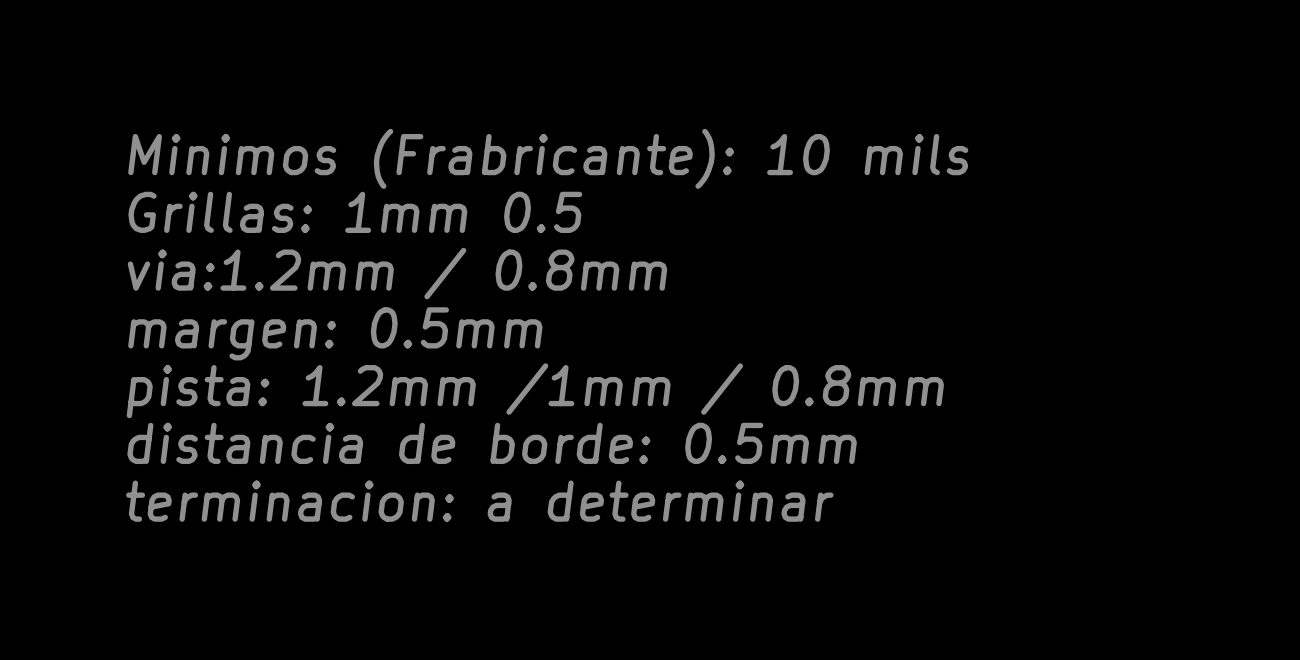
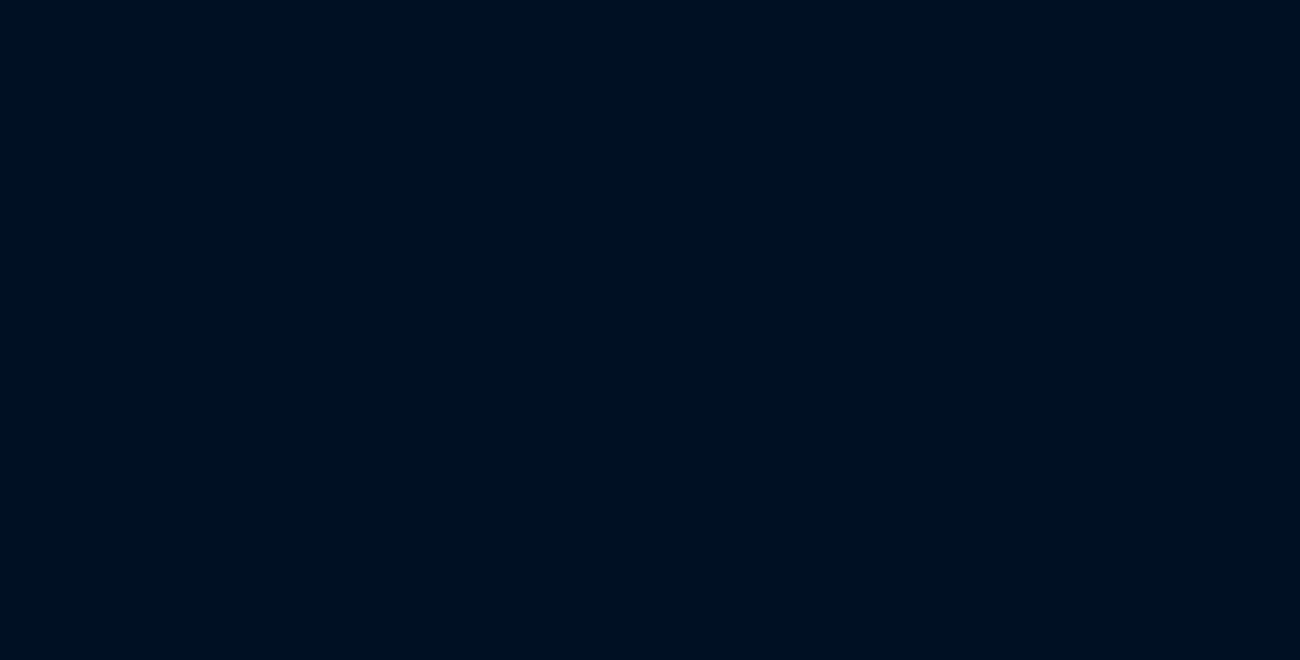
text: Minimos (Frabricante): 10 mils (548, 158) -> none
text: Grillas: 1mm 0.5 (355, 212) -> none
text: via:1.2mm / 0.8mm (397, 273) -> none
text: margen: 0.5mm (335, 333) -> none
text: pista: 1.2mm /1mm / 0.8mm (535, 390) -> none
text: distancia de borde: 0.5mm (492, 443) -> none
text: terminacion: a determinar (479, 501) -> none

